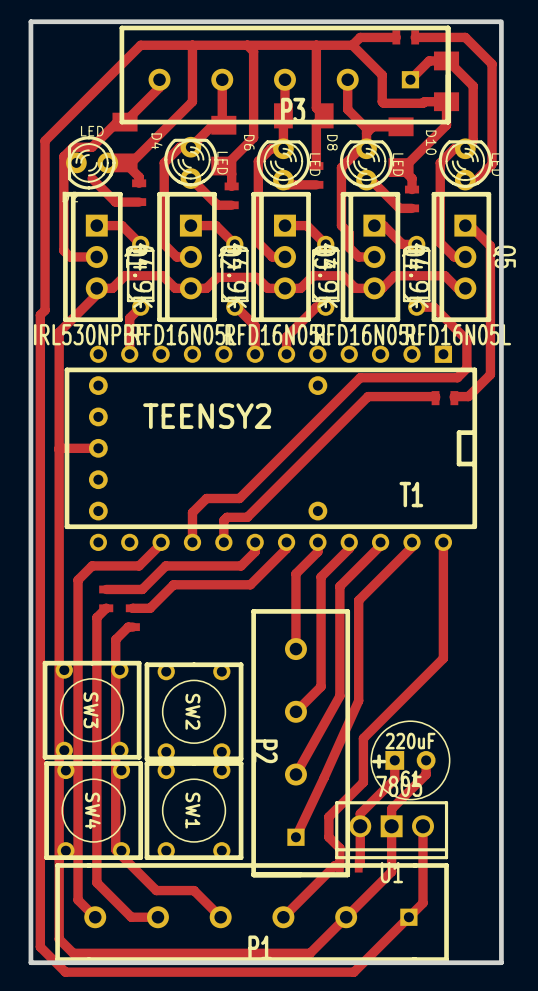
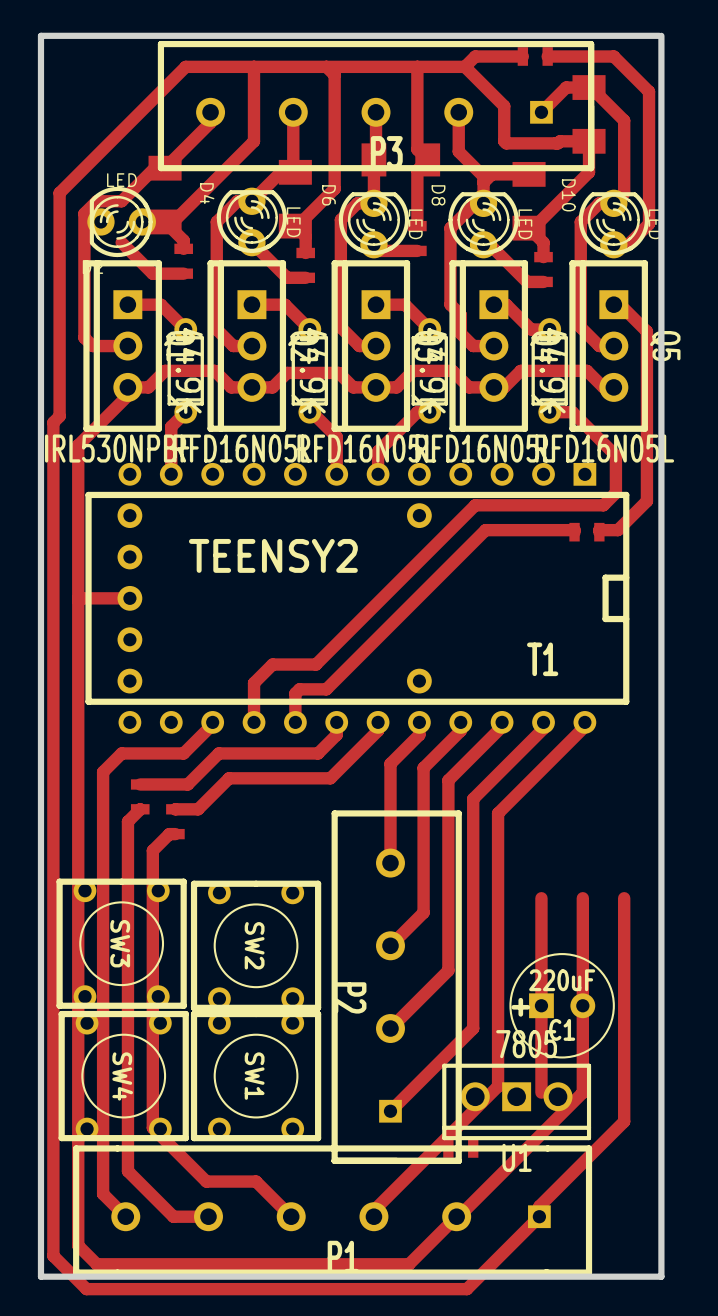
top track: (443, 545) (443, 658) (363, 738) (363, 782) (328, 816) (328, 837) (339, 848) (339, 865) (335, 865) (283, 917) -> (584, 726) (498, 813) (498, 1086) (373, 1210) (373, 1216)
top track: none -> (541, 898) (541, 1092)
top track: (339, 696) (295, 774) -> (448, 925) (448, 970) (390, 1028)
top track: (358, 700) (295, 837) -> (473, 931) (473, 1028) (390, 1111)
top track: (394, 760) (394, 779) (360, 813) (360, 863) (358, 865) -> none
C1 position: (410, 760) -> (562, 1005)
top track: (426, 760) (426, 774) (391, 809) (391, 871) (346, 917) -> (582, 898) (582, 1092) (456, 1216)
top track: (423, 826) (423, 903) (408, 917) -> (624, 898) (624, 1121) (539, 1206) (539, 1216)

